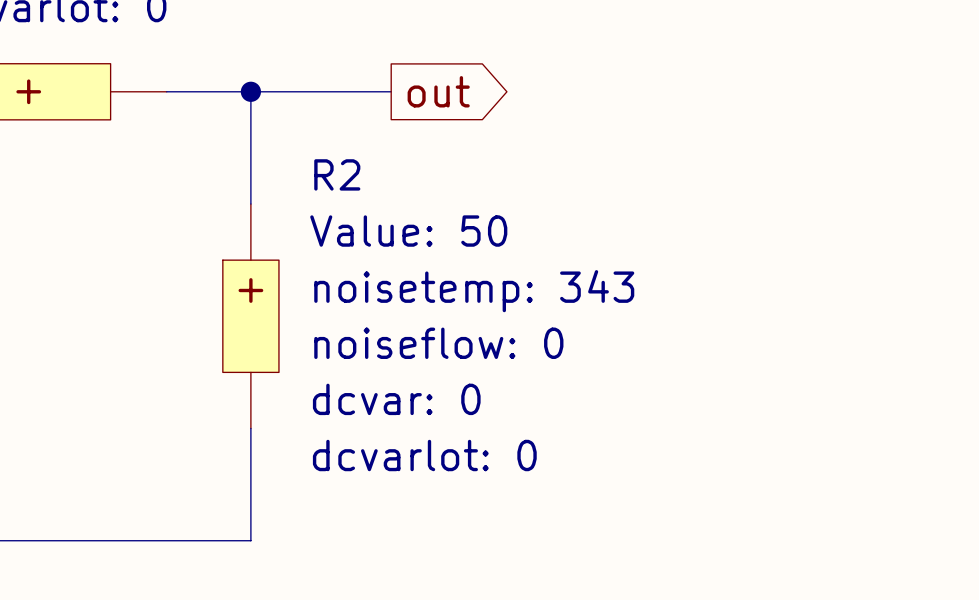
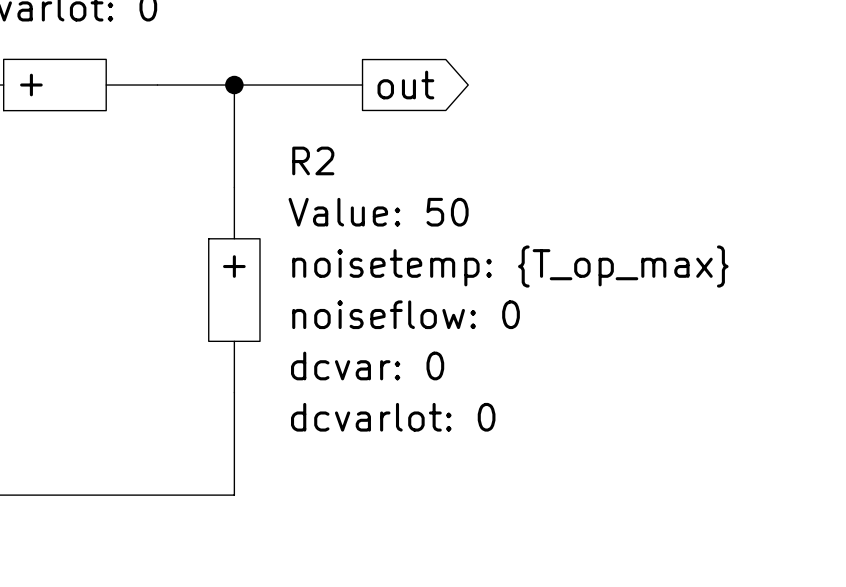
R2 text: noisetemp: 343 (474, 291) -> noisetemp: {T_op_max} (510, 266)

